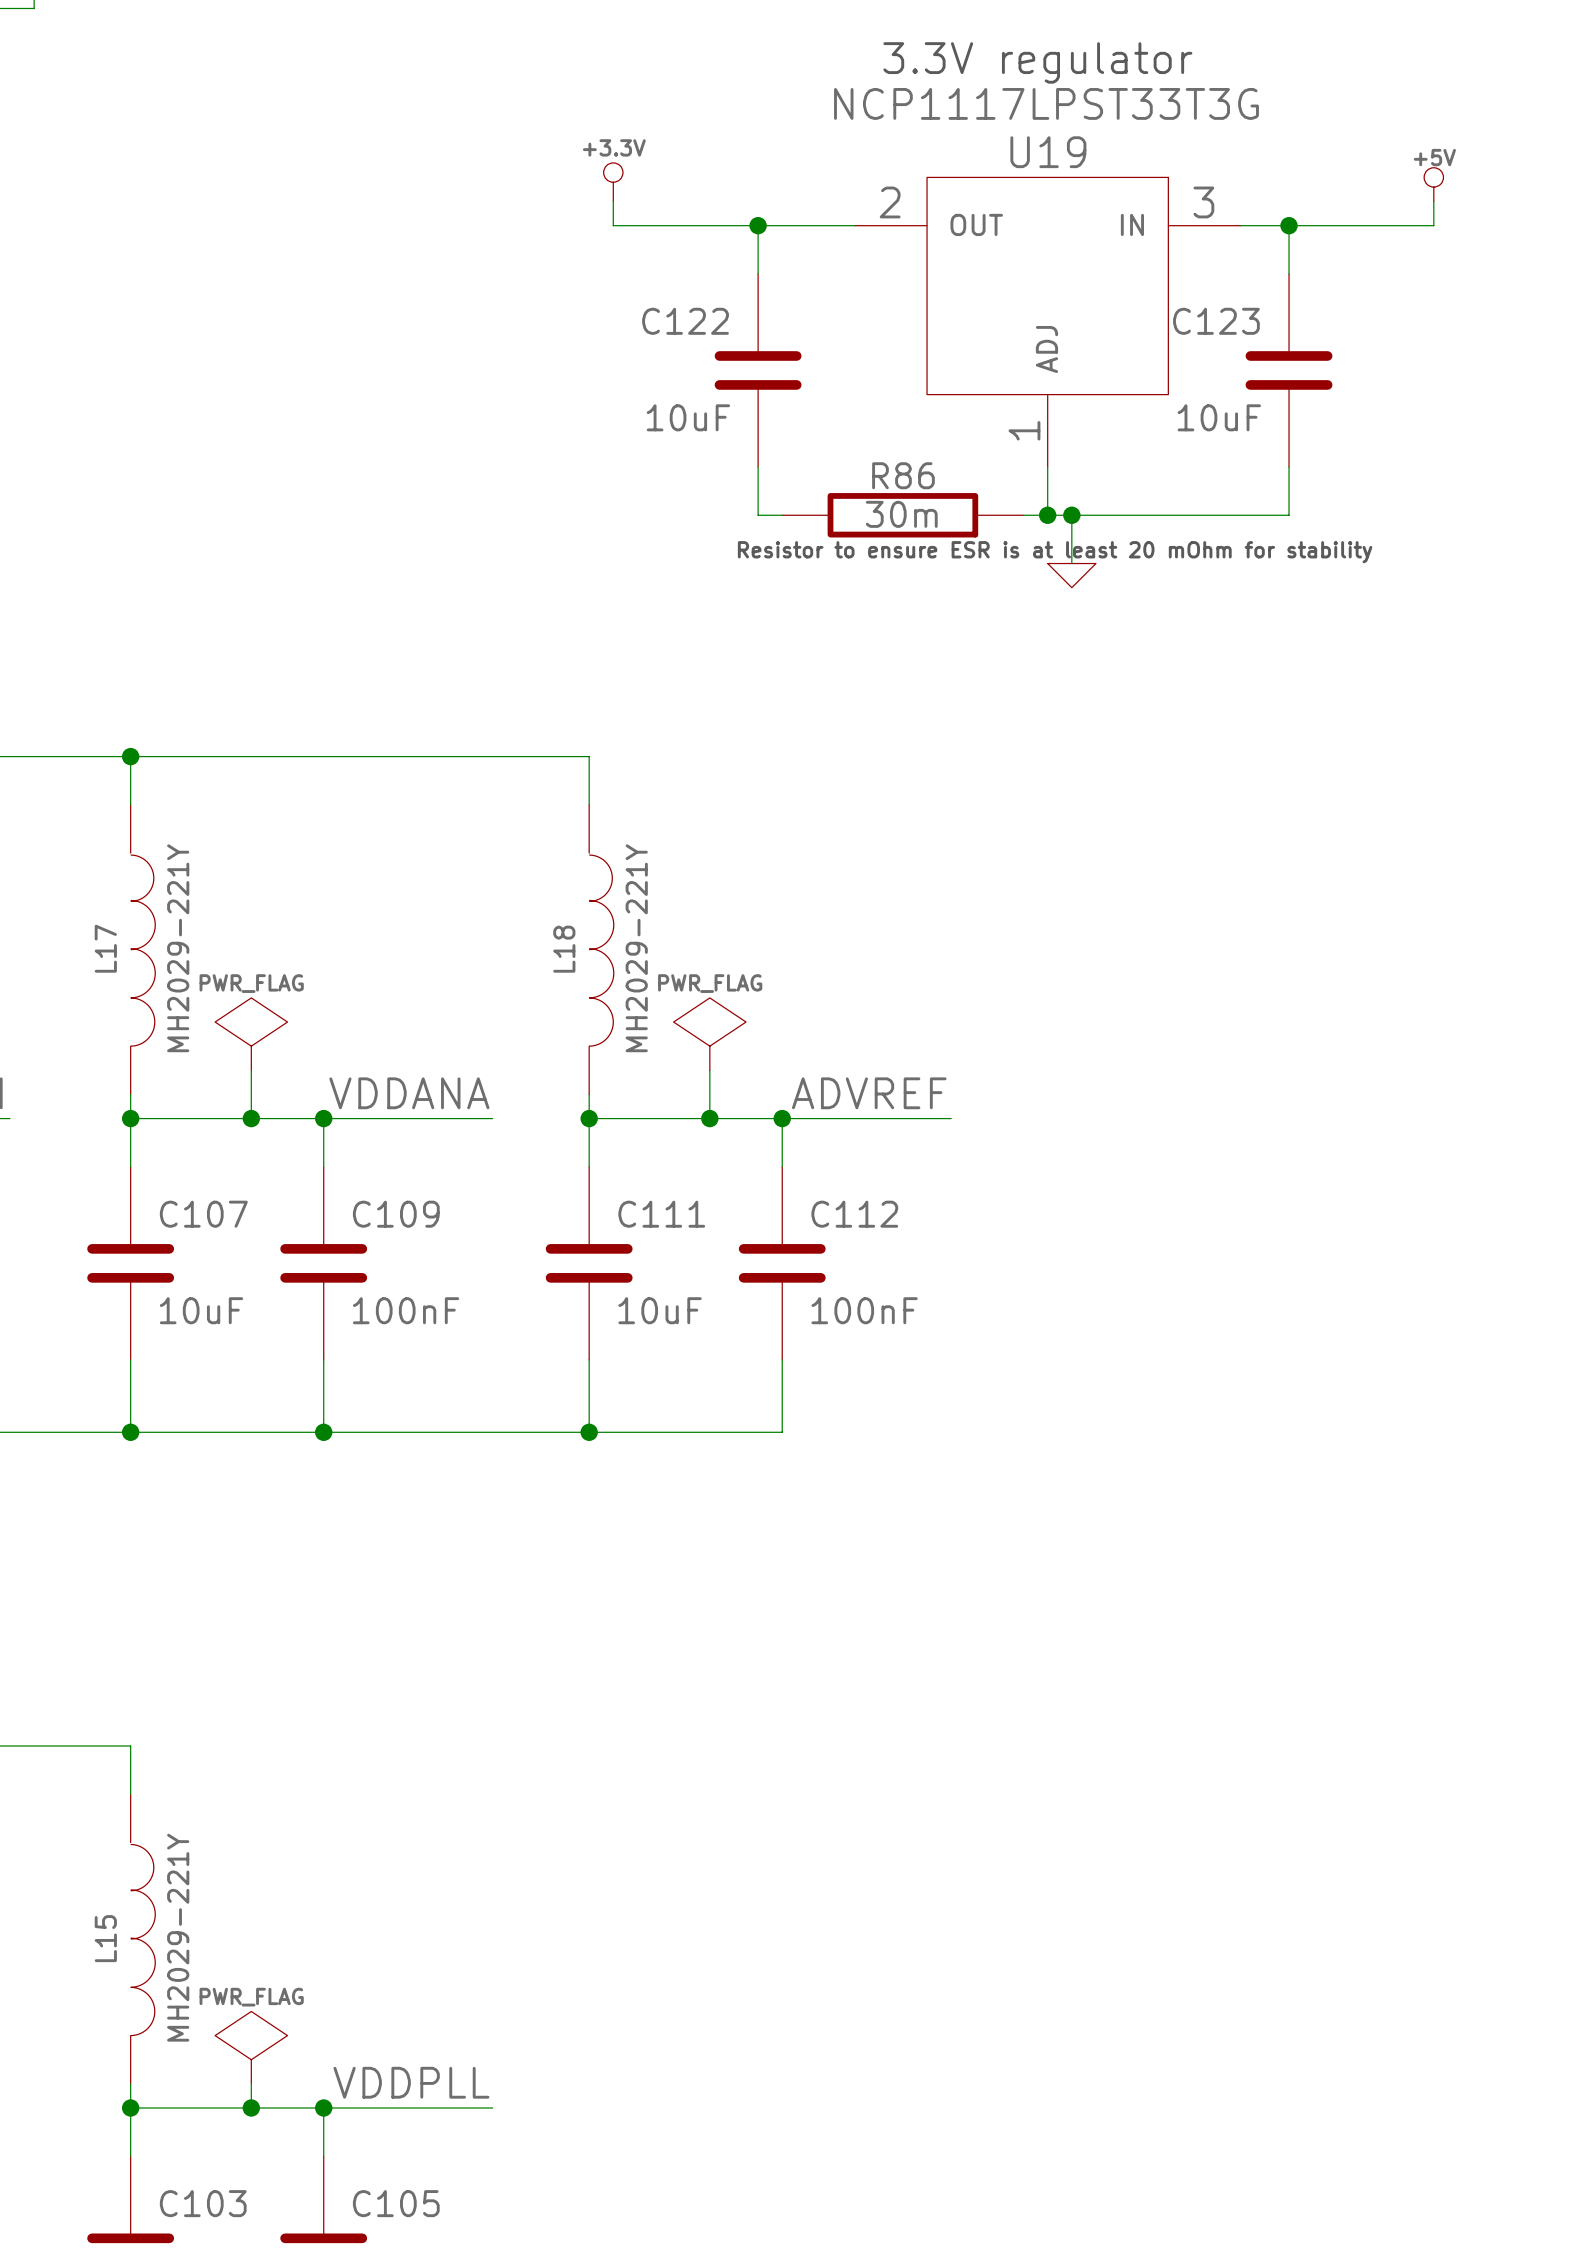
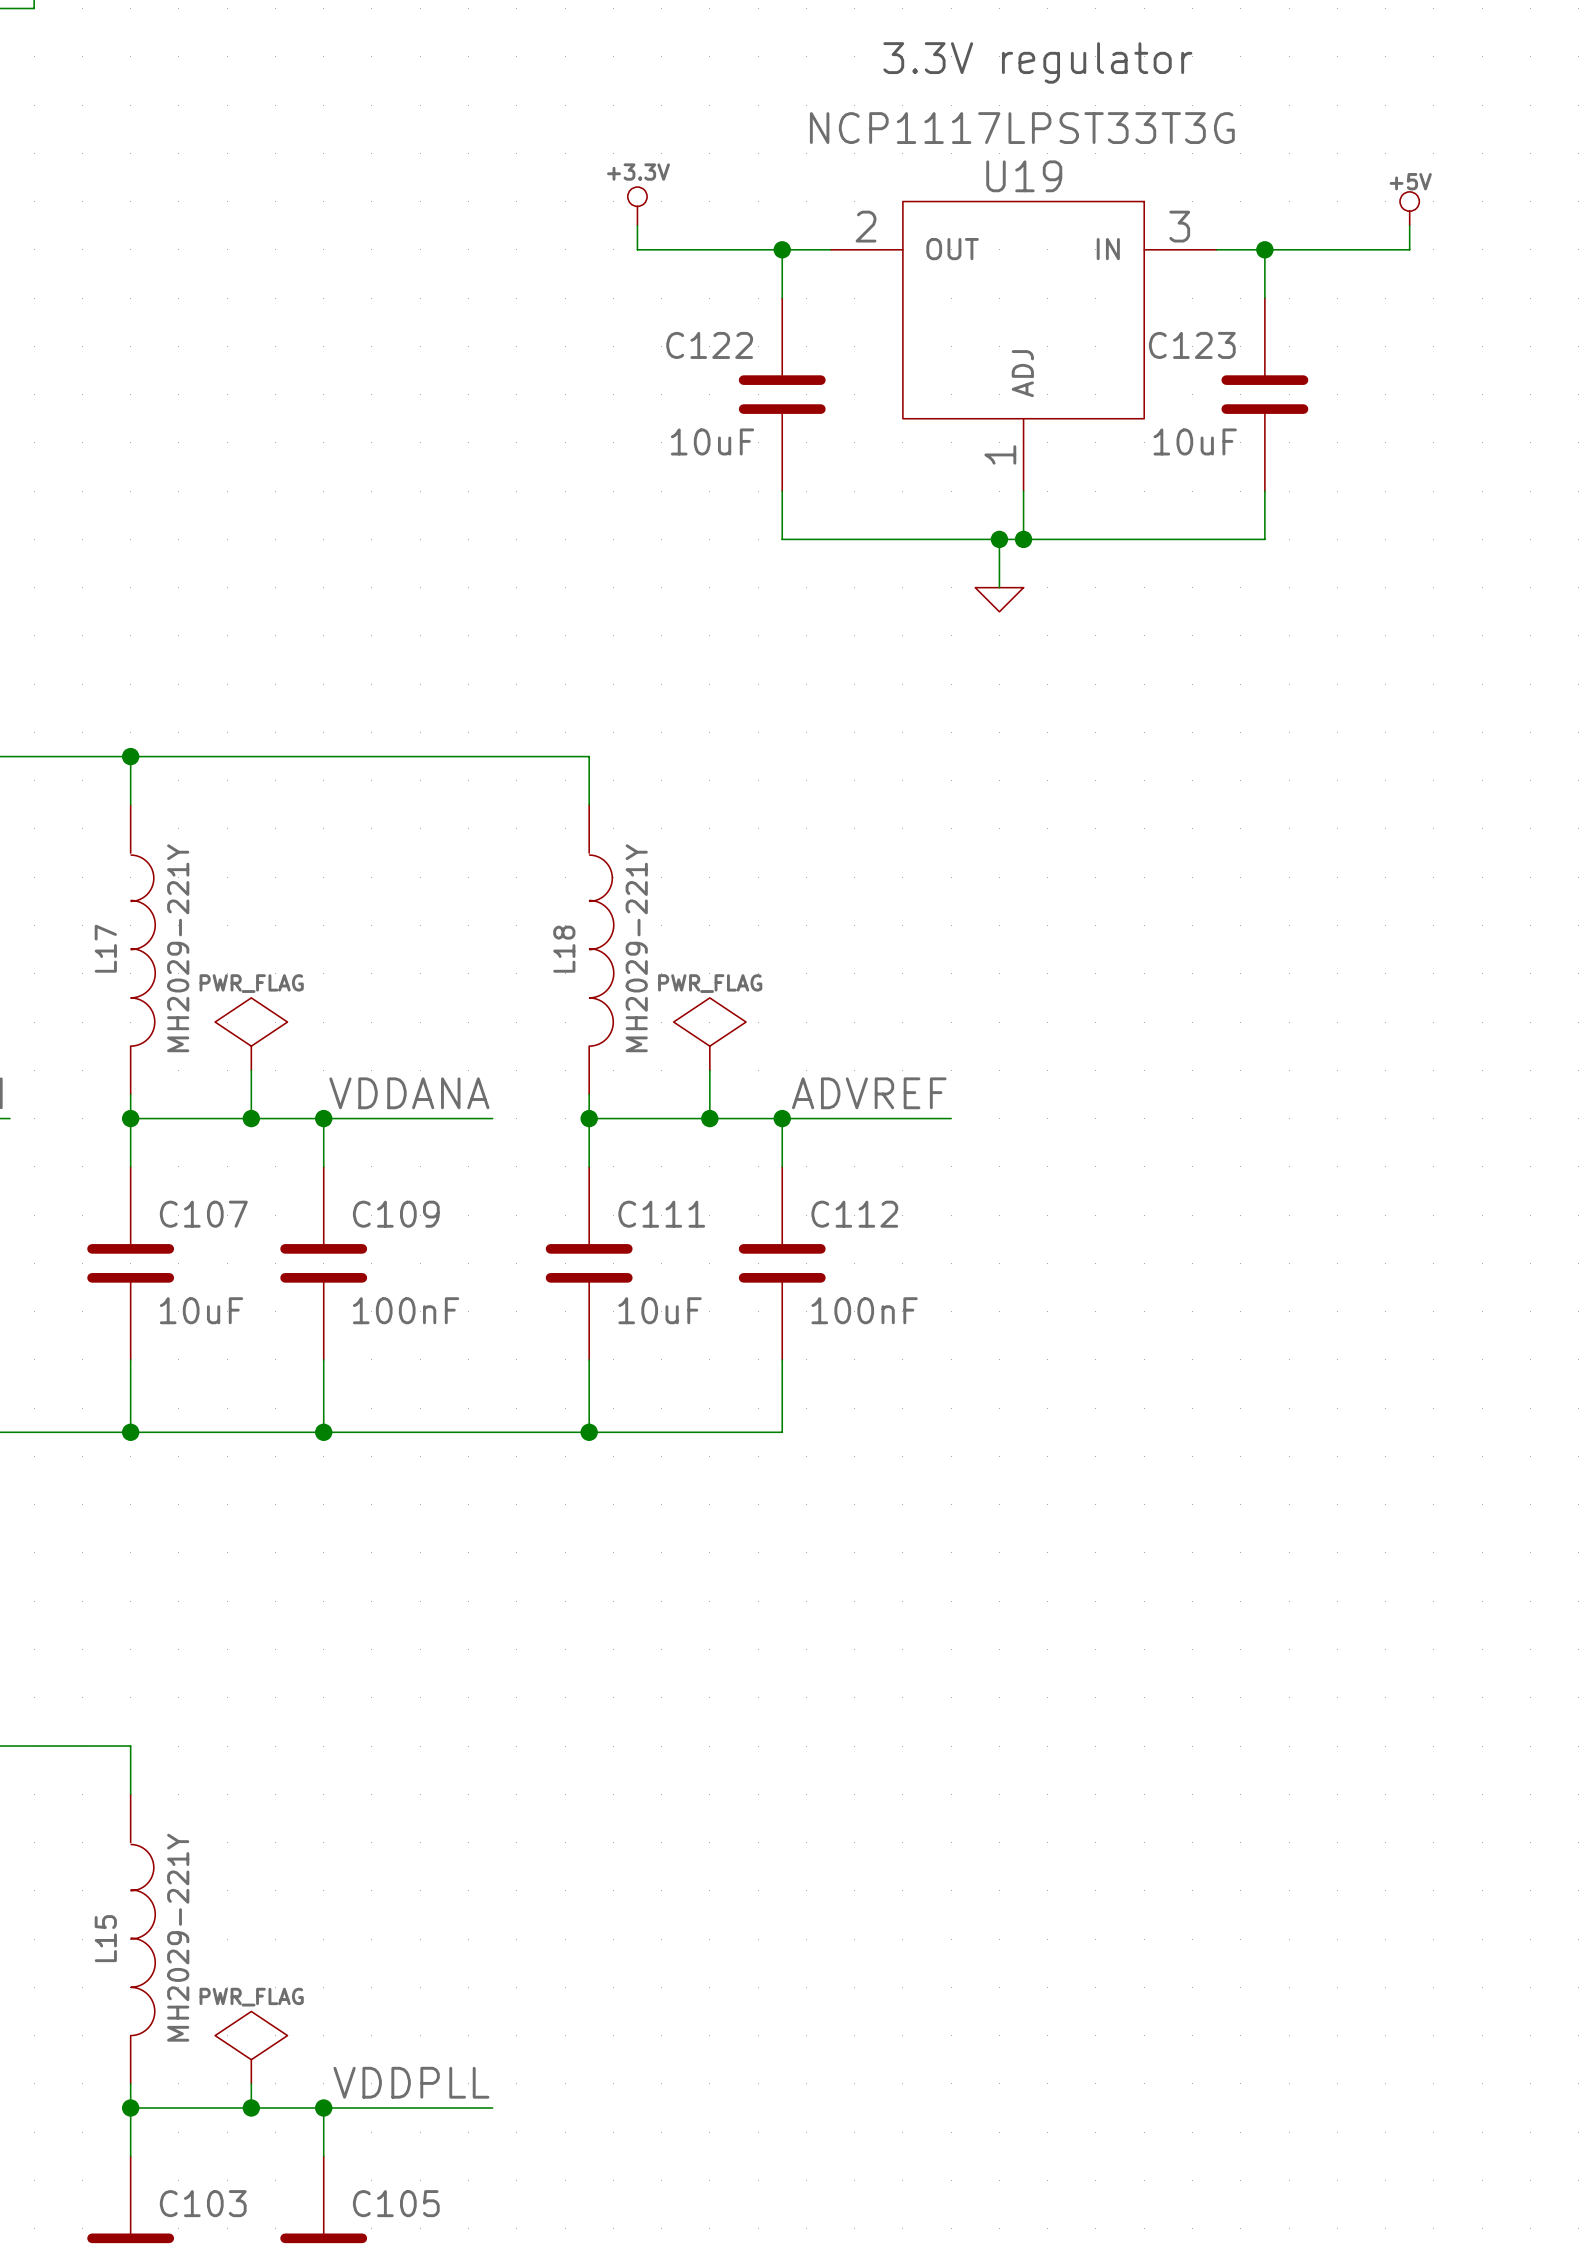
power symbol position: +3.3V (613, 182) -> +3.3V (637, 206)
power symbol position: +5V (1433, 184) -> +5V (1409, 208)
wire: (613, 201) (613, 225) (854, 225) -> none
wire: (1433, 201) (1433, 225) (1240, 225) -> (1409, 225) (1409, 249) (1216, 249)
wire: none -> (637, 225) (637, 249) (830, 249)
wire: (758, 225) (758, 273) -> (782, 249) (782, 298)
junction position: (758, 225) -> (782, 249)
wire: (1289, 225) (1289, 273) -> (1264, 249) (1264, 298)
junction position: (1289, 225) -> (1264, 249)
U19 position: (1047, 322) -> (1023, 346)
C122 position: (758, 370) -> (782, 394)
C123 position: (1289, 370) -> (1264, 394)
wire: (758, 467) (758, 515) (782, 515) -> none
wire: (1047, 467) (1047, 515) -> (1023, 491) (1023, 539)
wire: (1289, 467) (1289, 515) (1023, 515) -> none
wire: none -> (782, 491) (782, 539) (1264, 539) (1264, 491)
R86: 30m (902, 515) -> none
junction: (1047, 515) -> none
wire: (1071, 515) (1071, 563) -> (999, 539) (999, 587)
junction: (1071, 515) -> none
junction: none -> (999, 539)
junction: none -> (1023, 539)
text: Resistor to ensure ESR is at least 20 mOhm for stability (1055, 552) -> none
power symbol position: (1071, 575) -> (999, 599)

